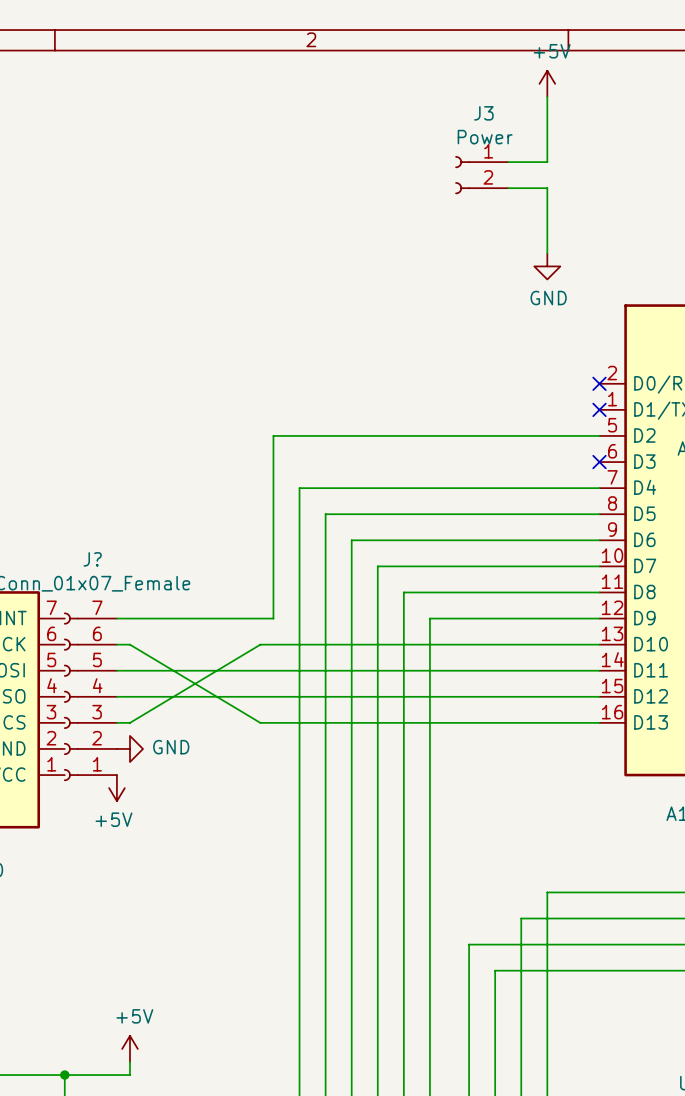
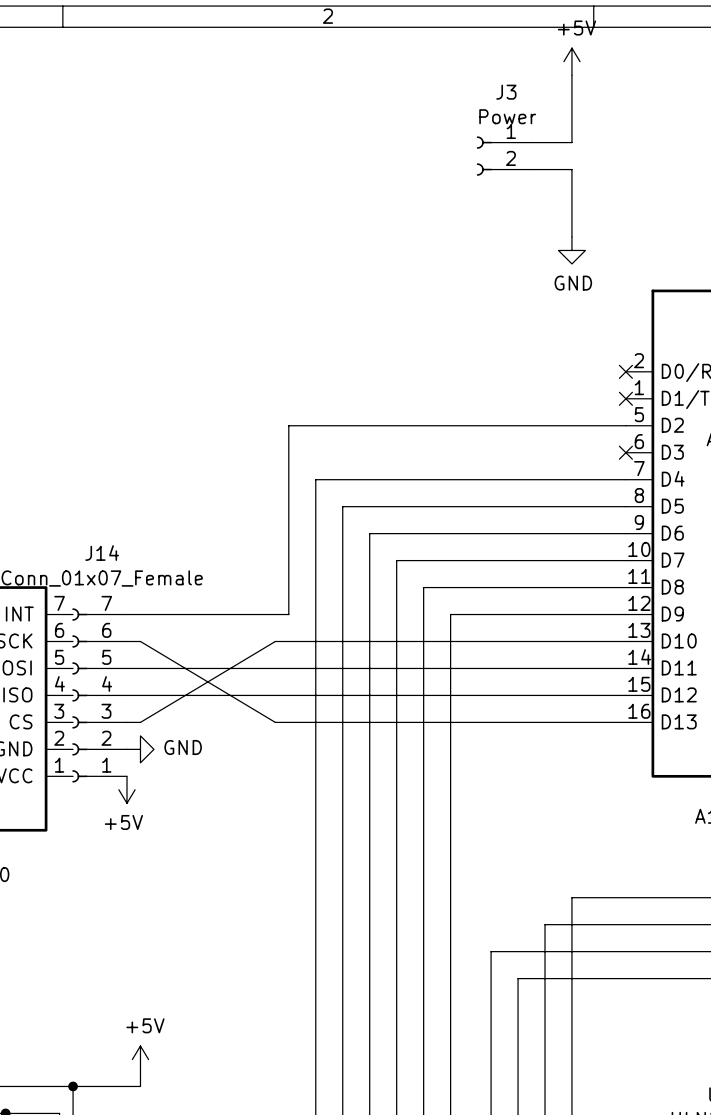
J? name: J? (92, 559) -> J14 (102, 553)

